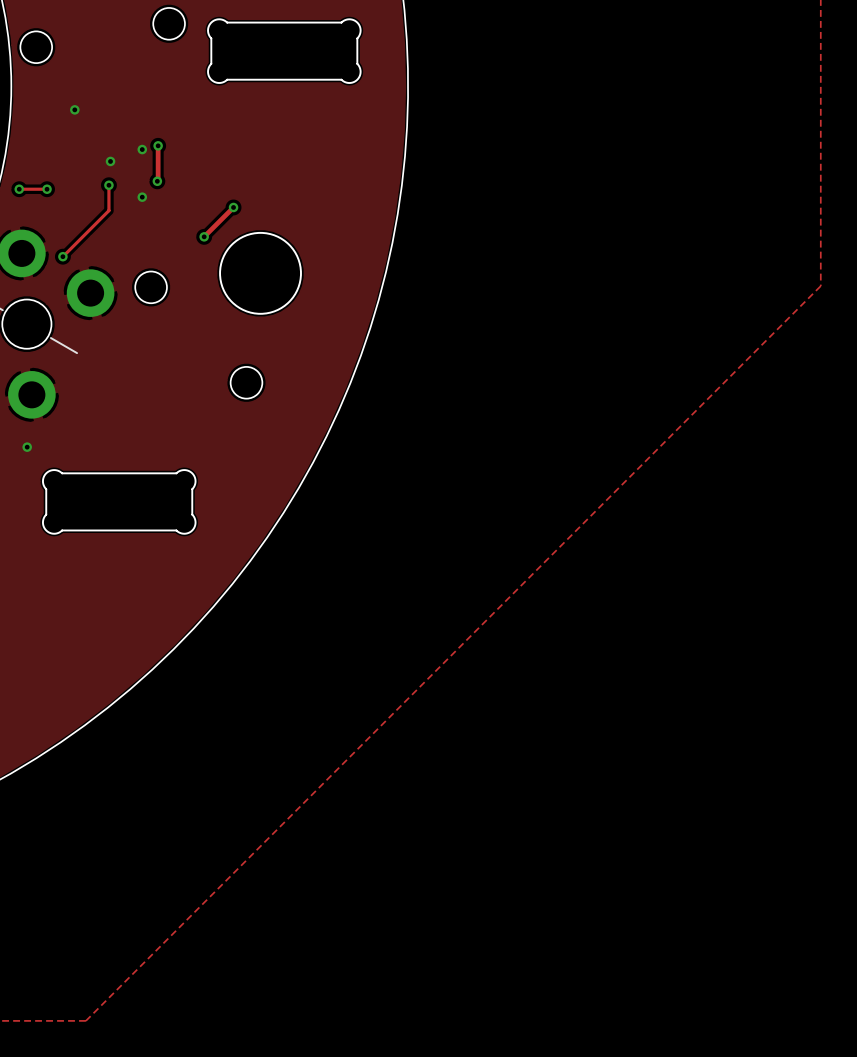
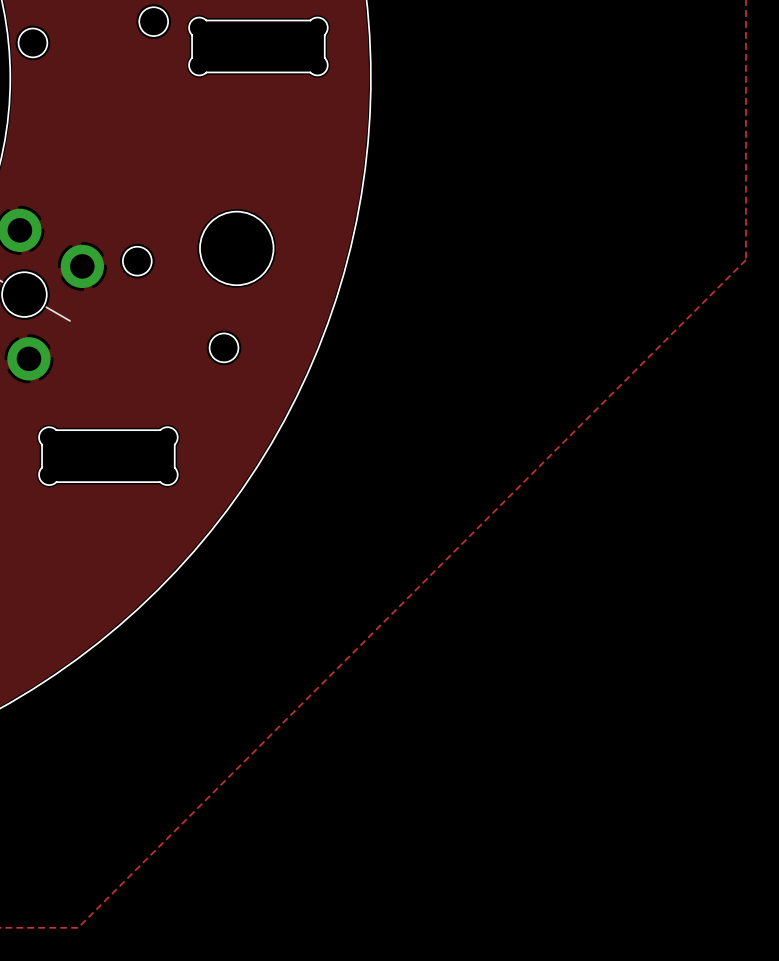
via: (74, 109) -> none
track: (158, 145) (157, 181) -> none
via: (158, 145) -> none
via: (142, 149) -> none
via: (110, 161) -> none
via: (157, 181) -> none
track: (108, 185) (108, 210) (62, 256) -> none
via: (108, 185) -> none
track: (19, 189) (47, 189) -> none
via: (19, 189) -> none
via: (47, 189) -> none
via: (142, 197) -> none
track: (233, 207) (204, 236) -> none
via: (233, 207) -> none
via: (204, 236) -> none
via: (62, 256) -> none
via: (27, 447) -> none

